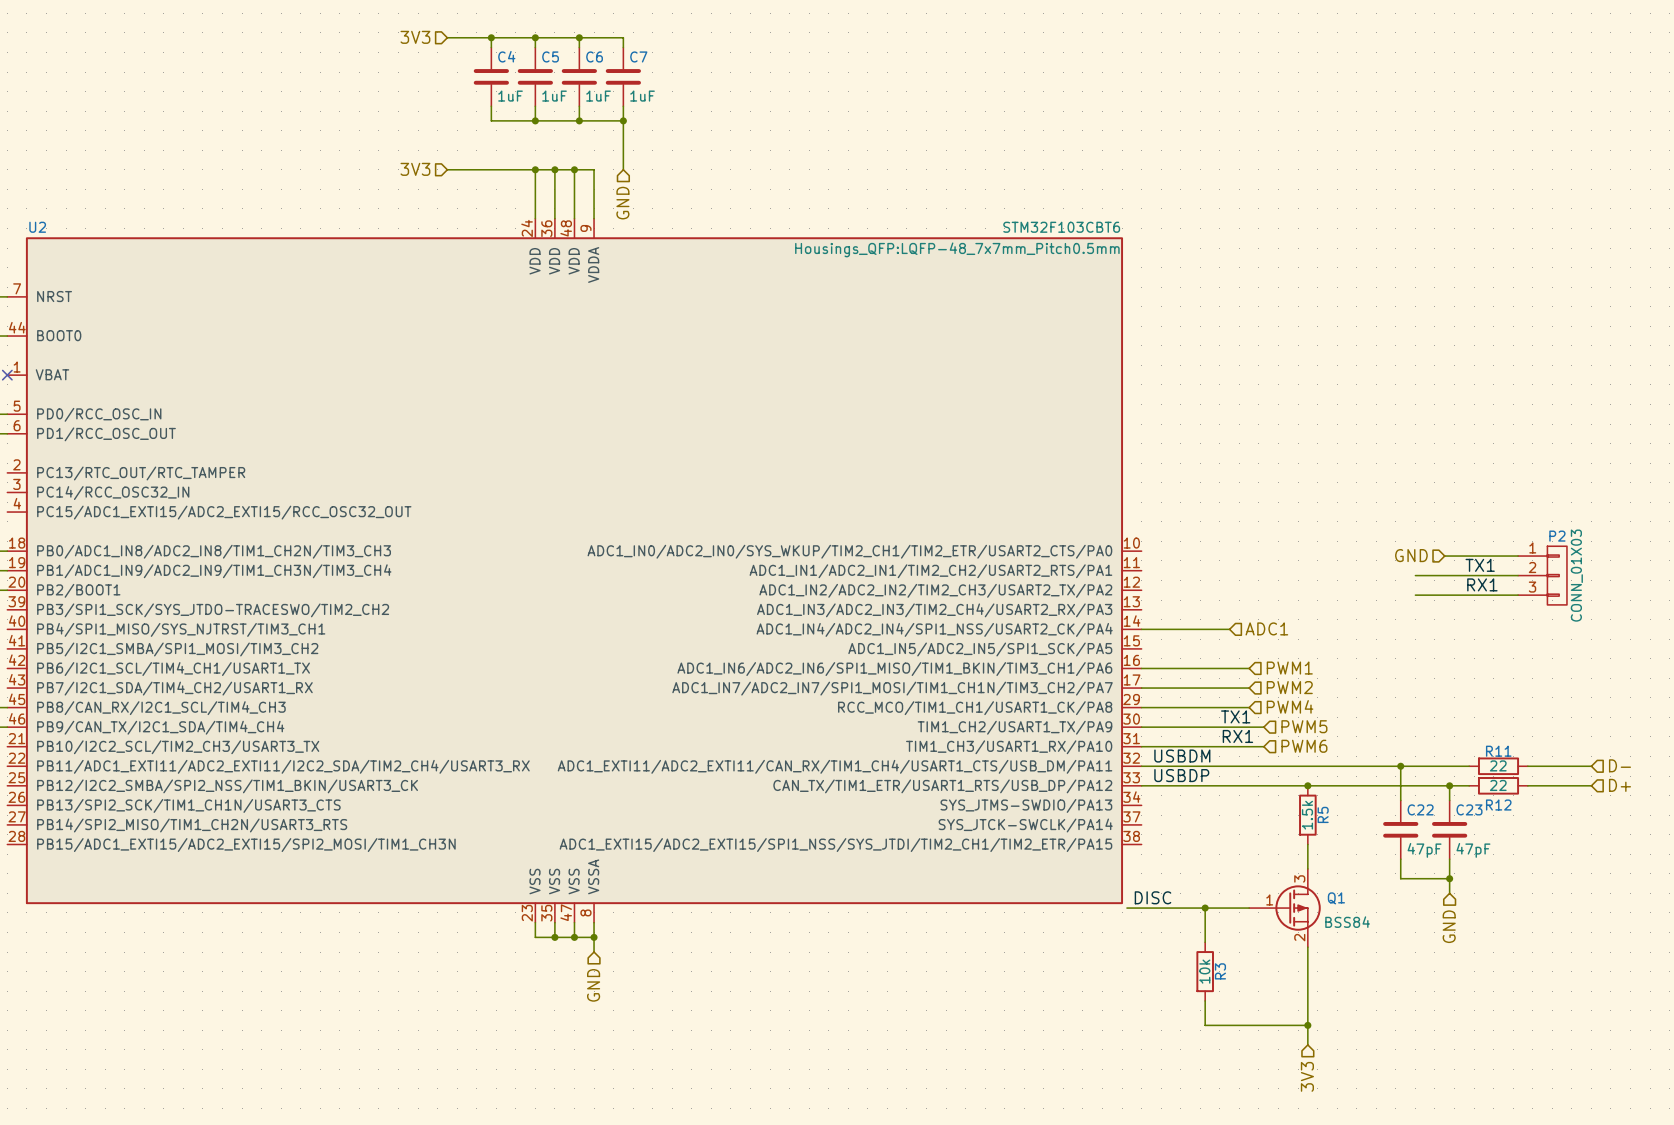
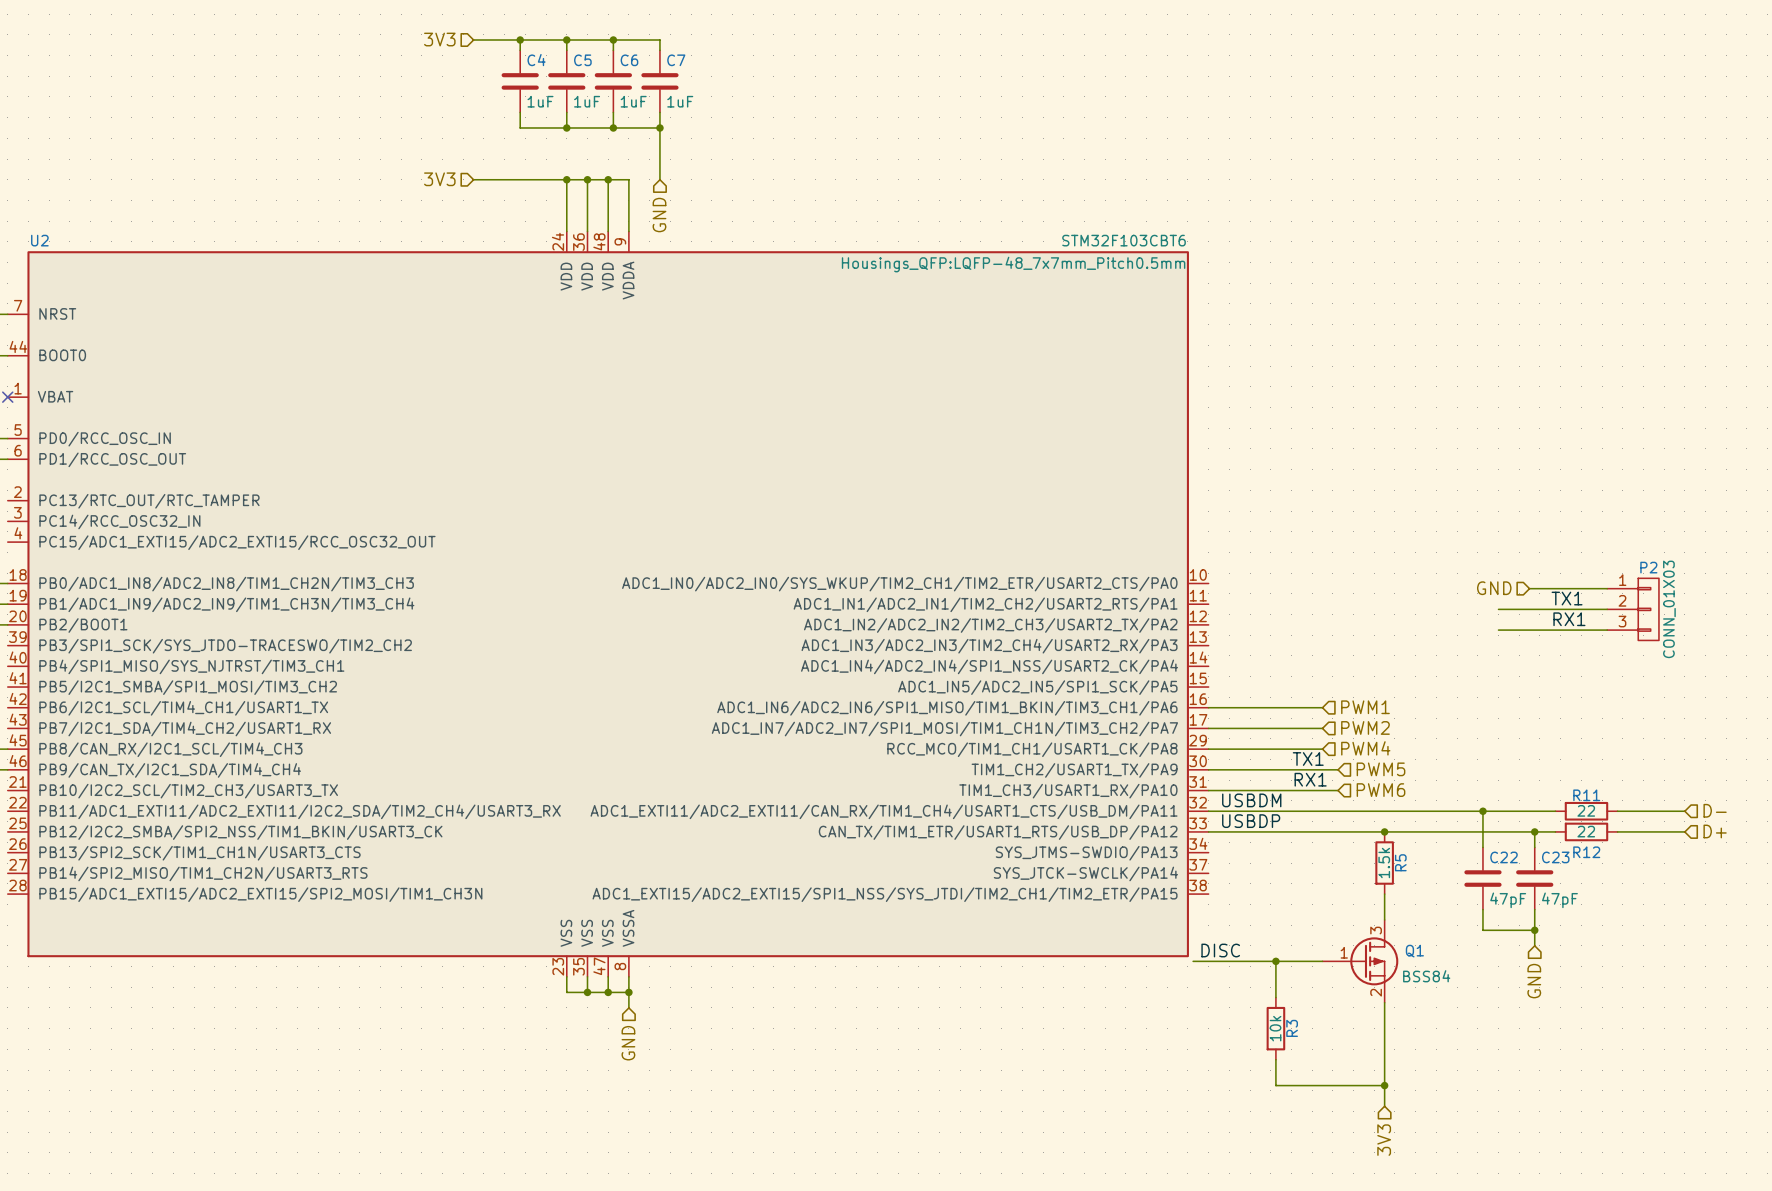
hierarchical label: ADC1 (1266, 628) -> none
wire: (1141, 629) (1229, 629) -> none

